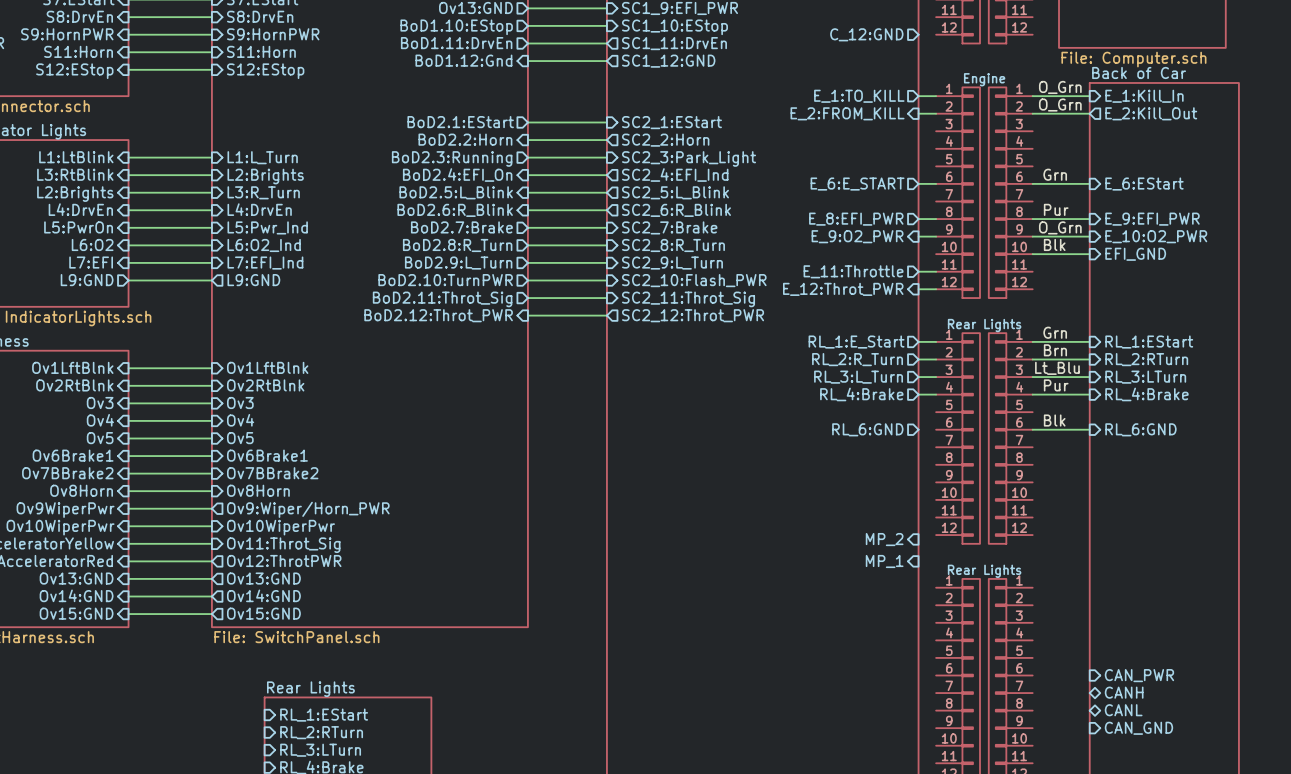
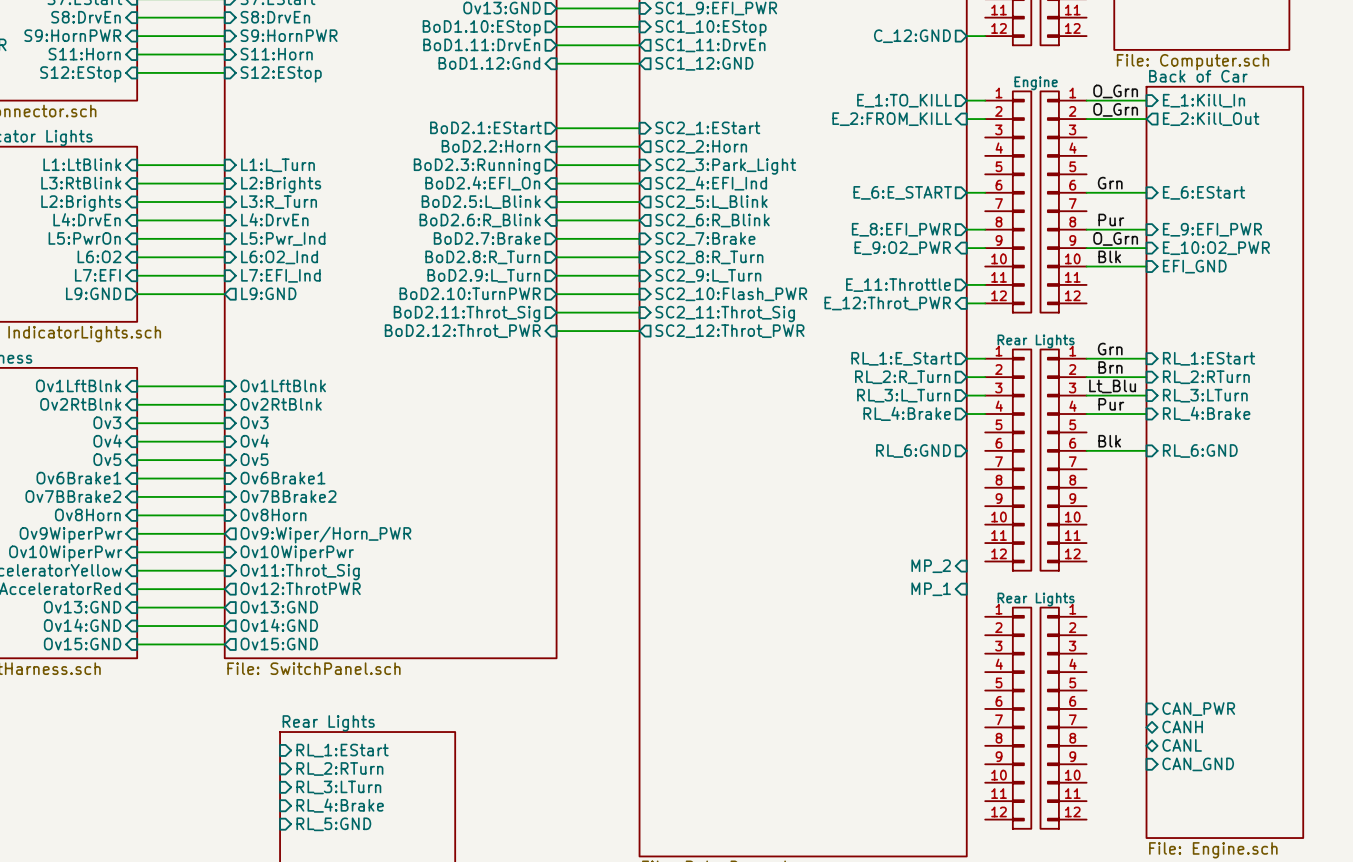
wire: none -> (966, 36) (985, 36)

